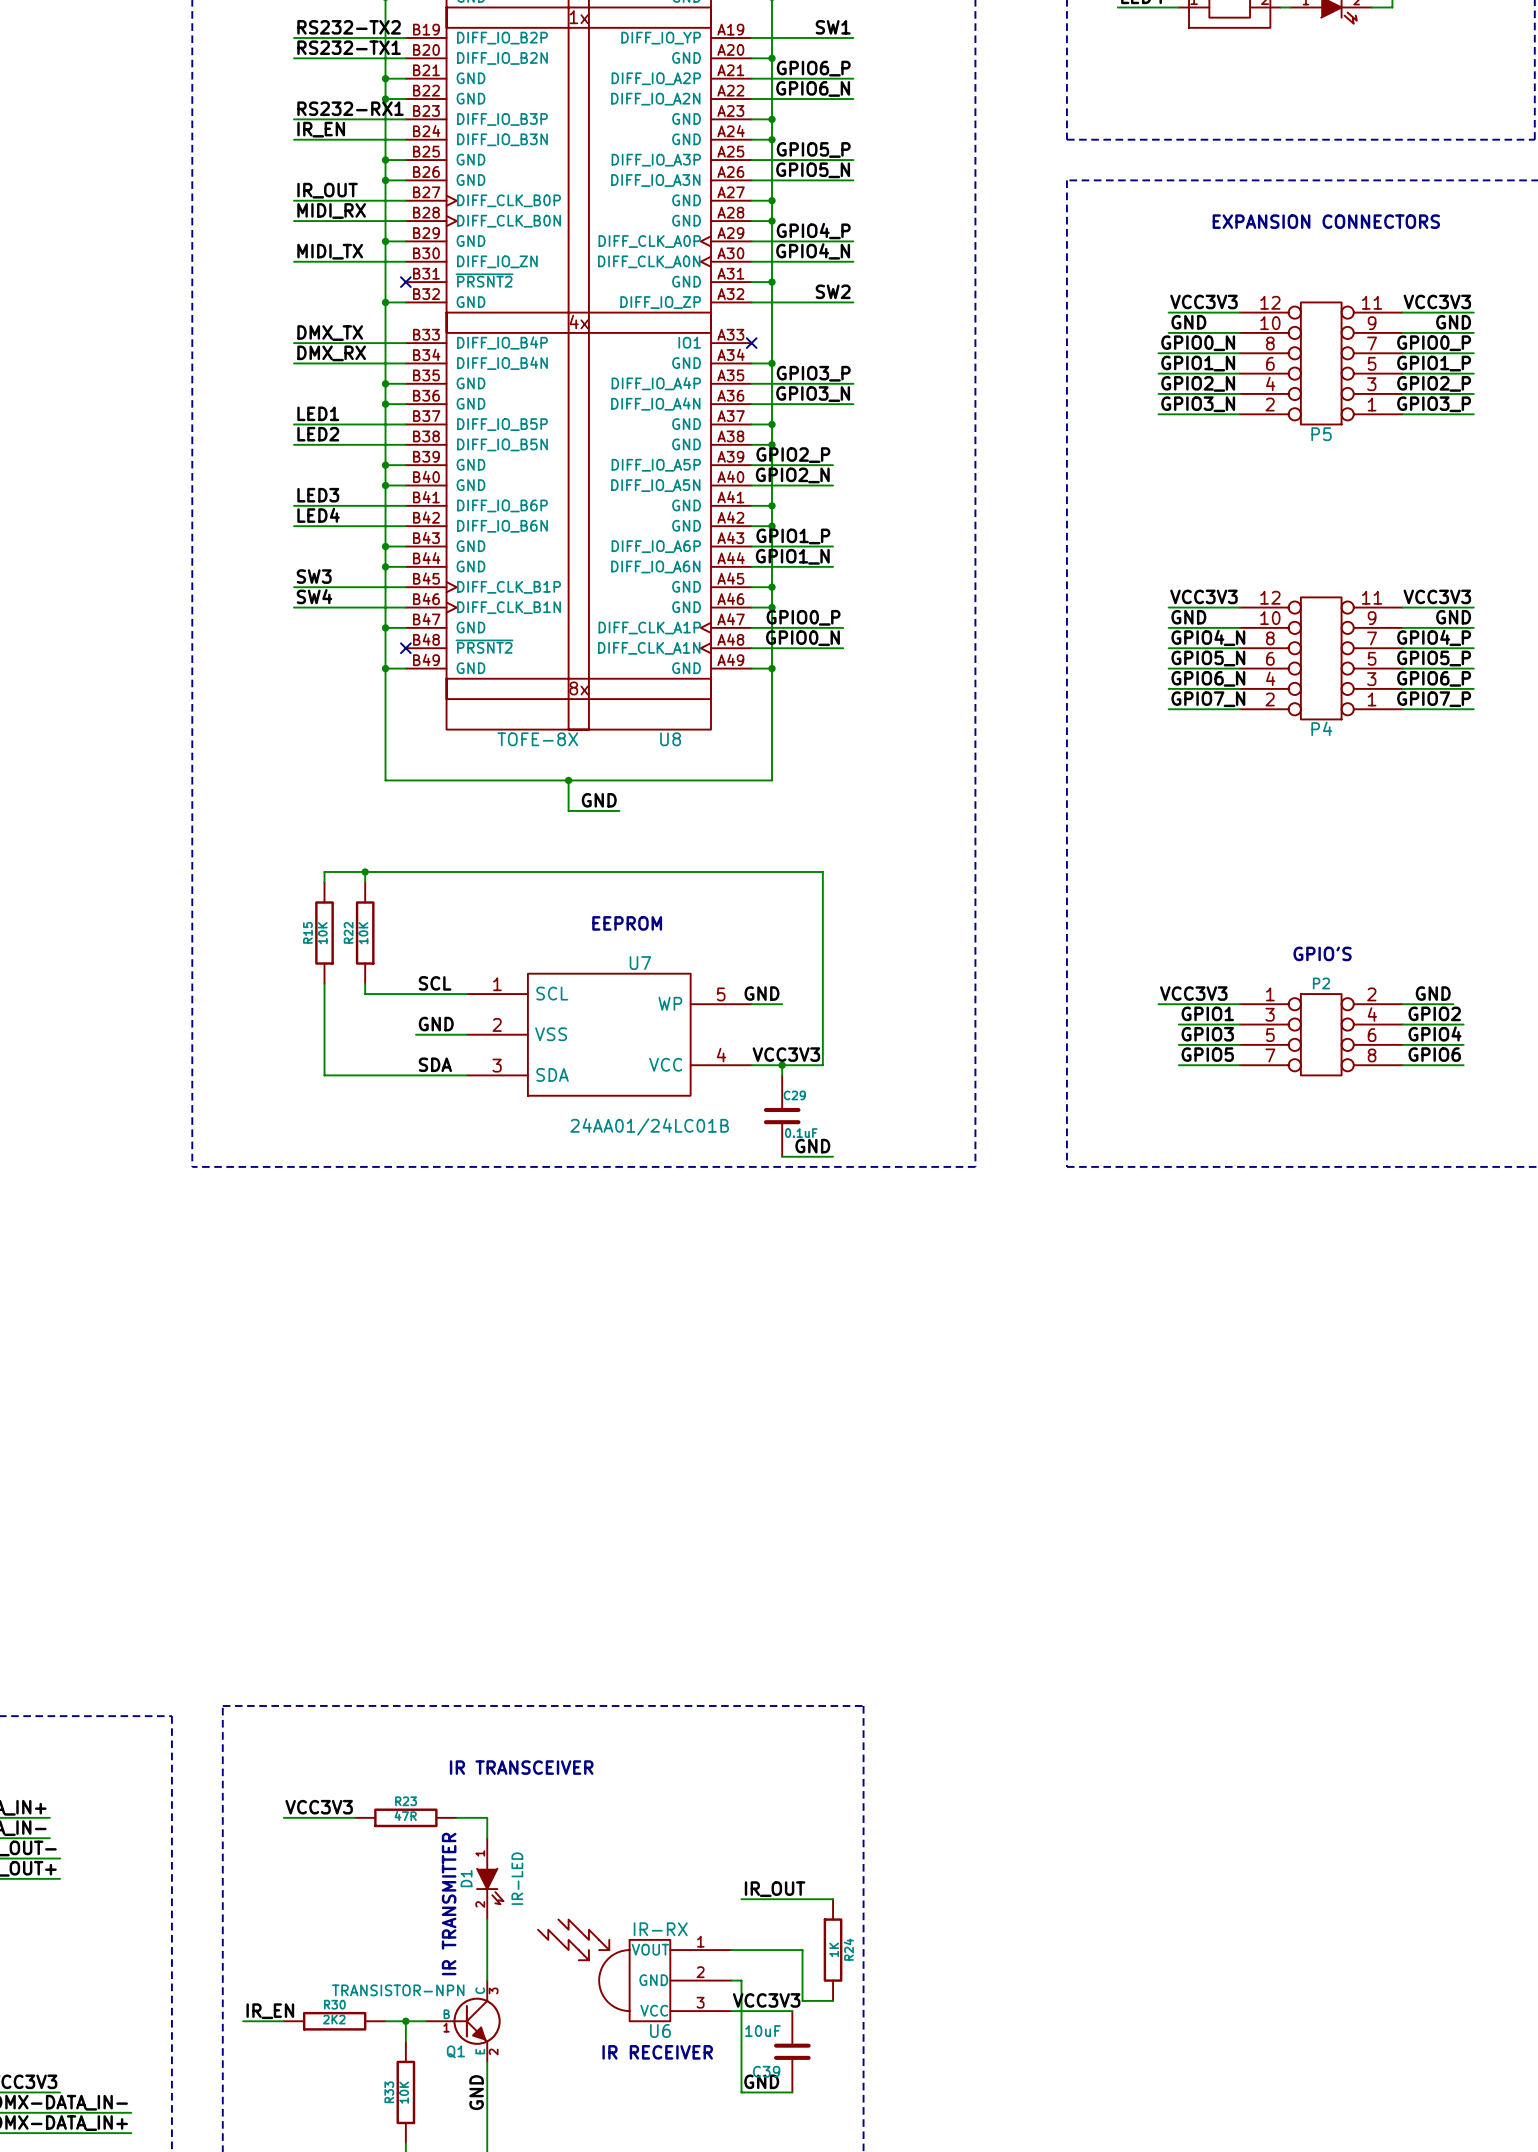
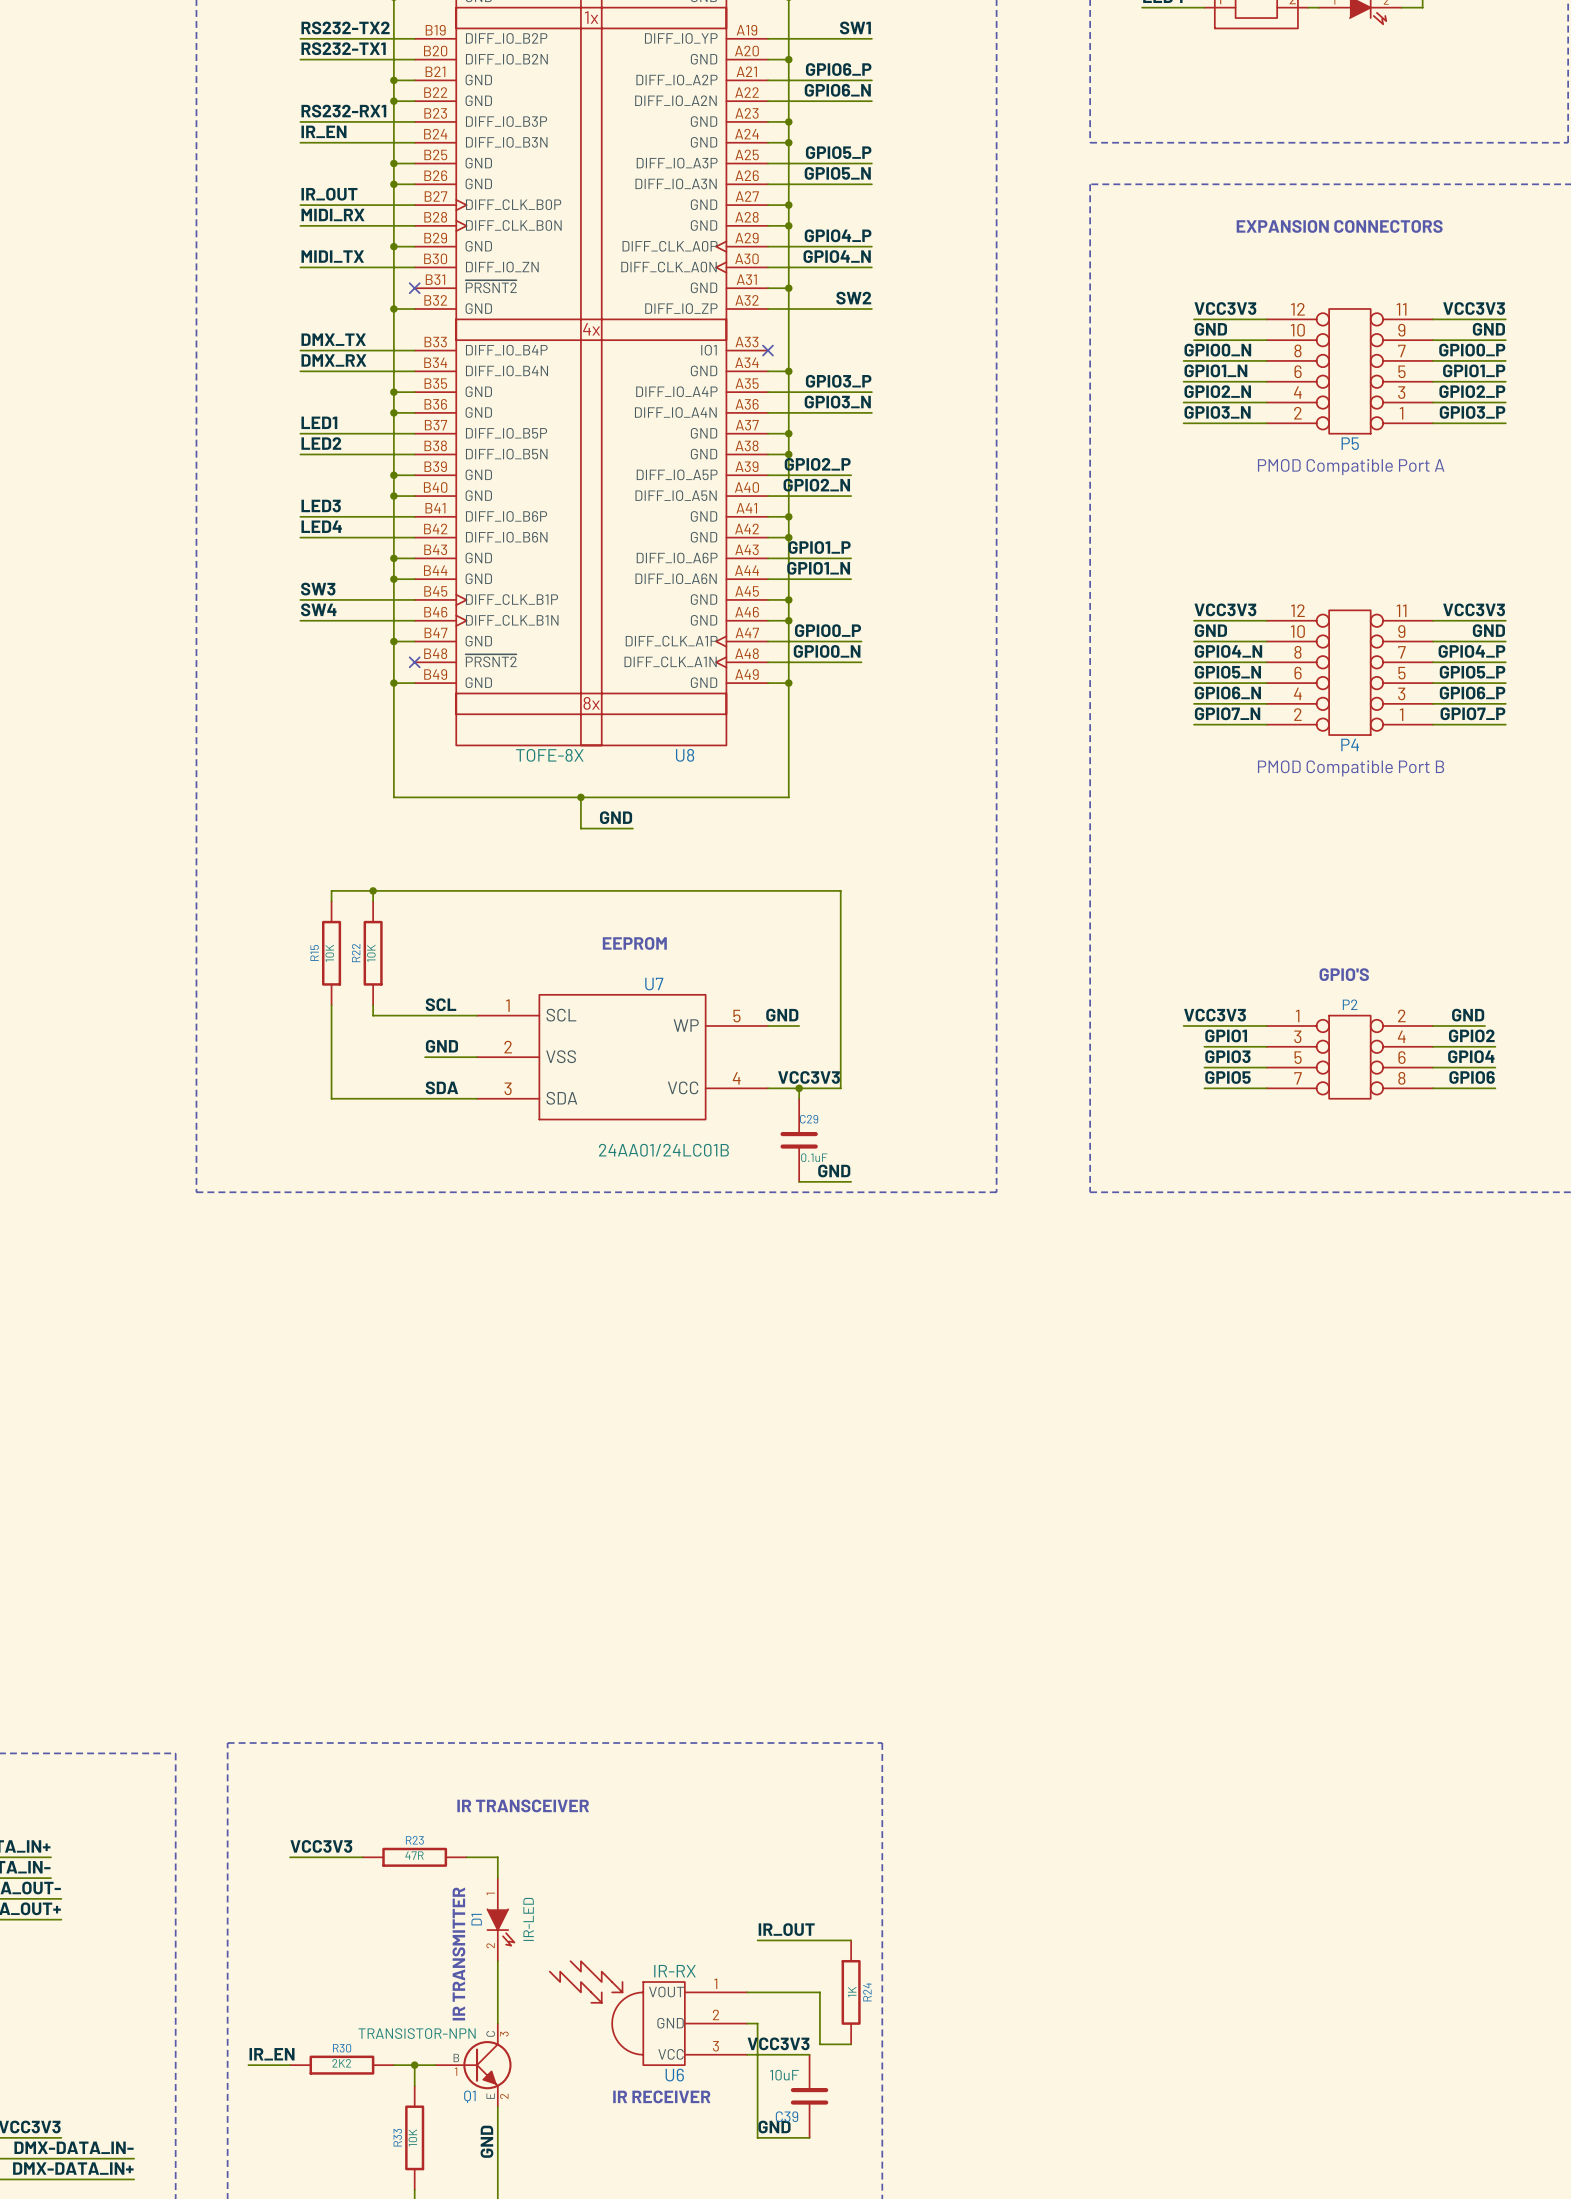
text: none -> PMOD Compatible Port A (1351, 467)
text: none -> PMOD Compatible Port B (1351, 768)

